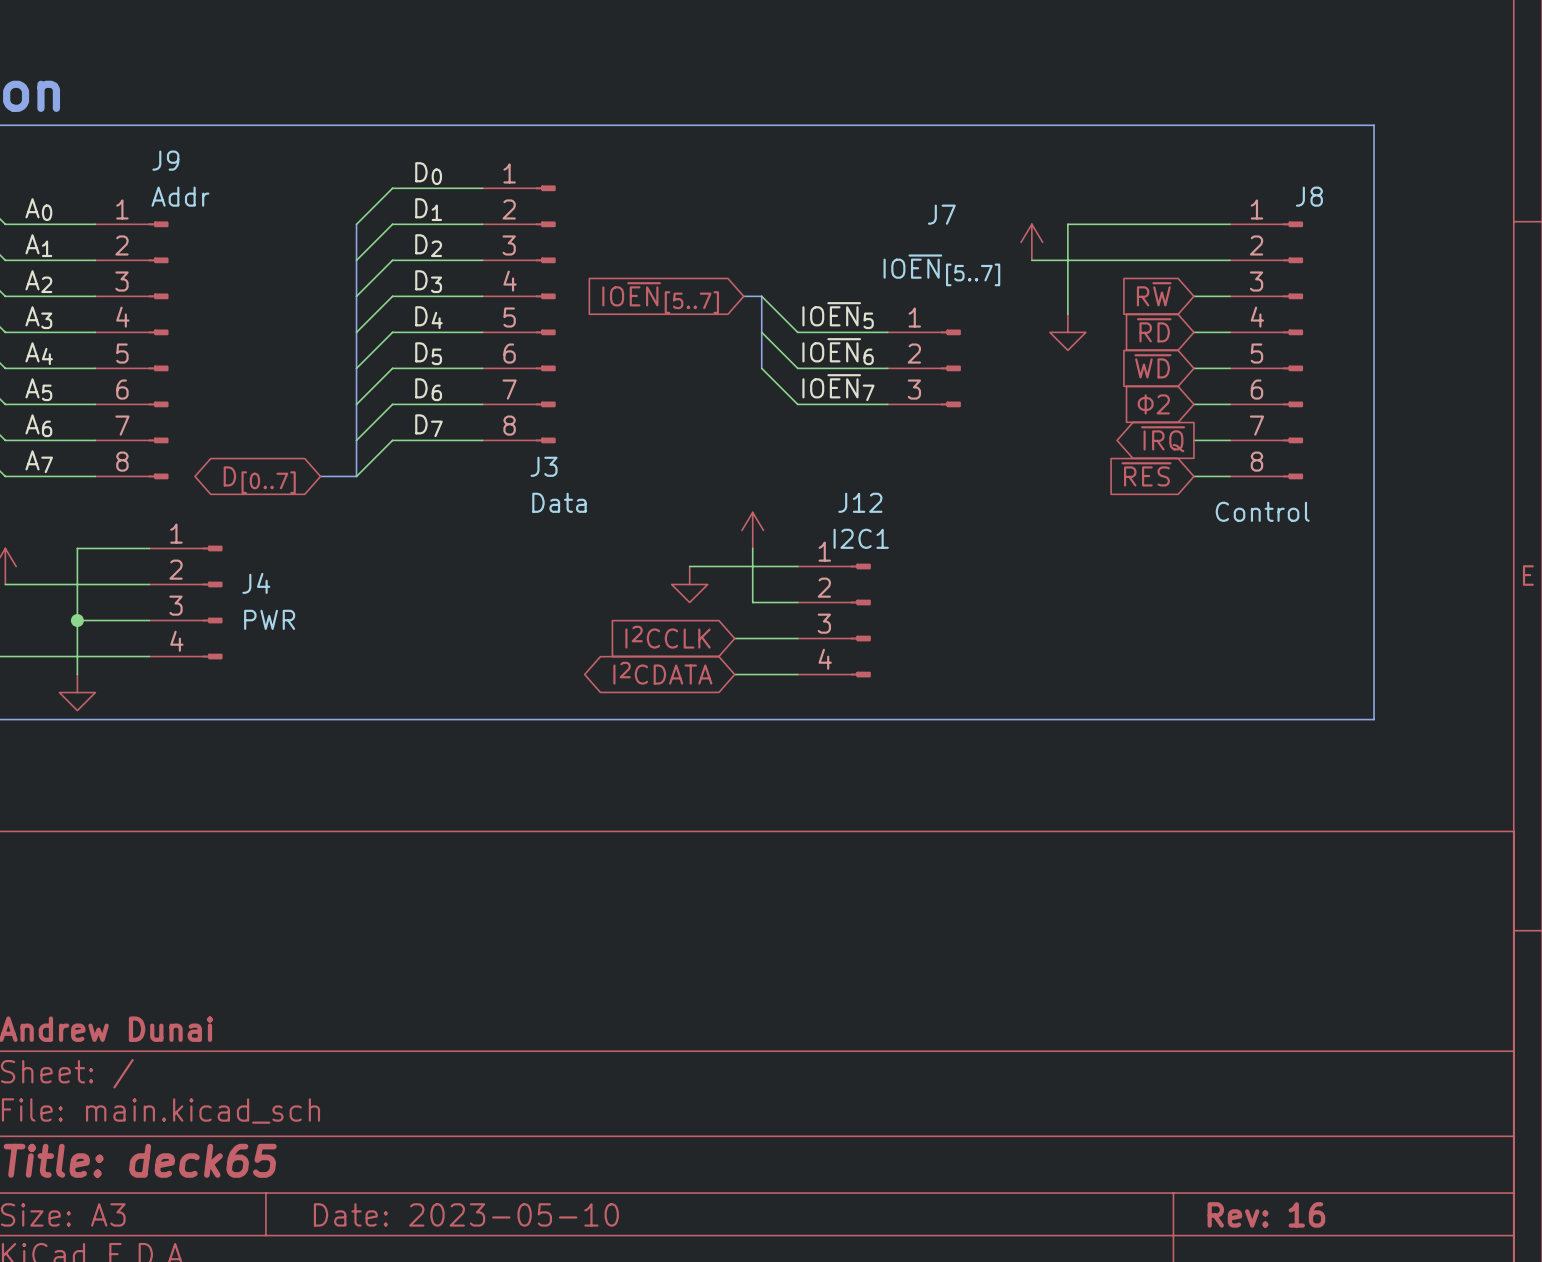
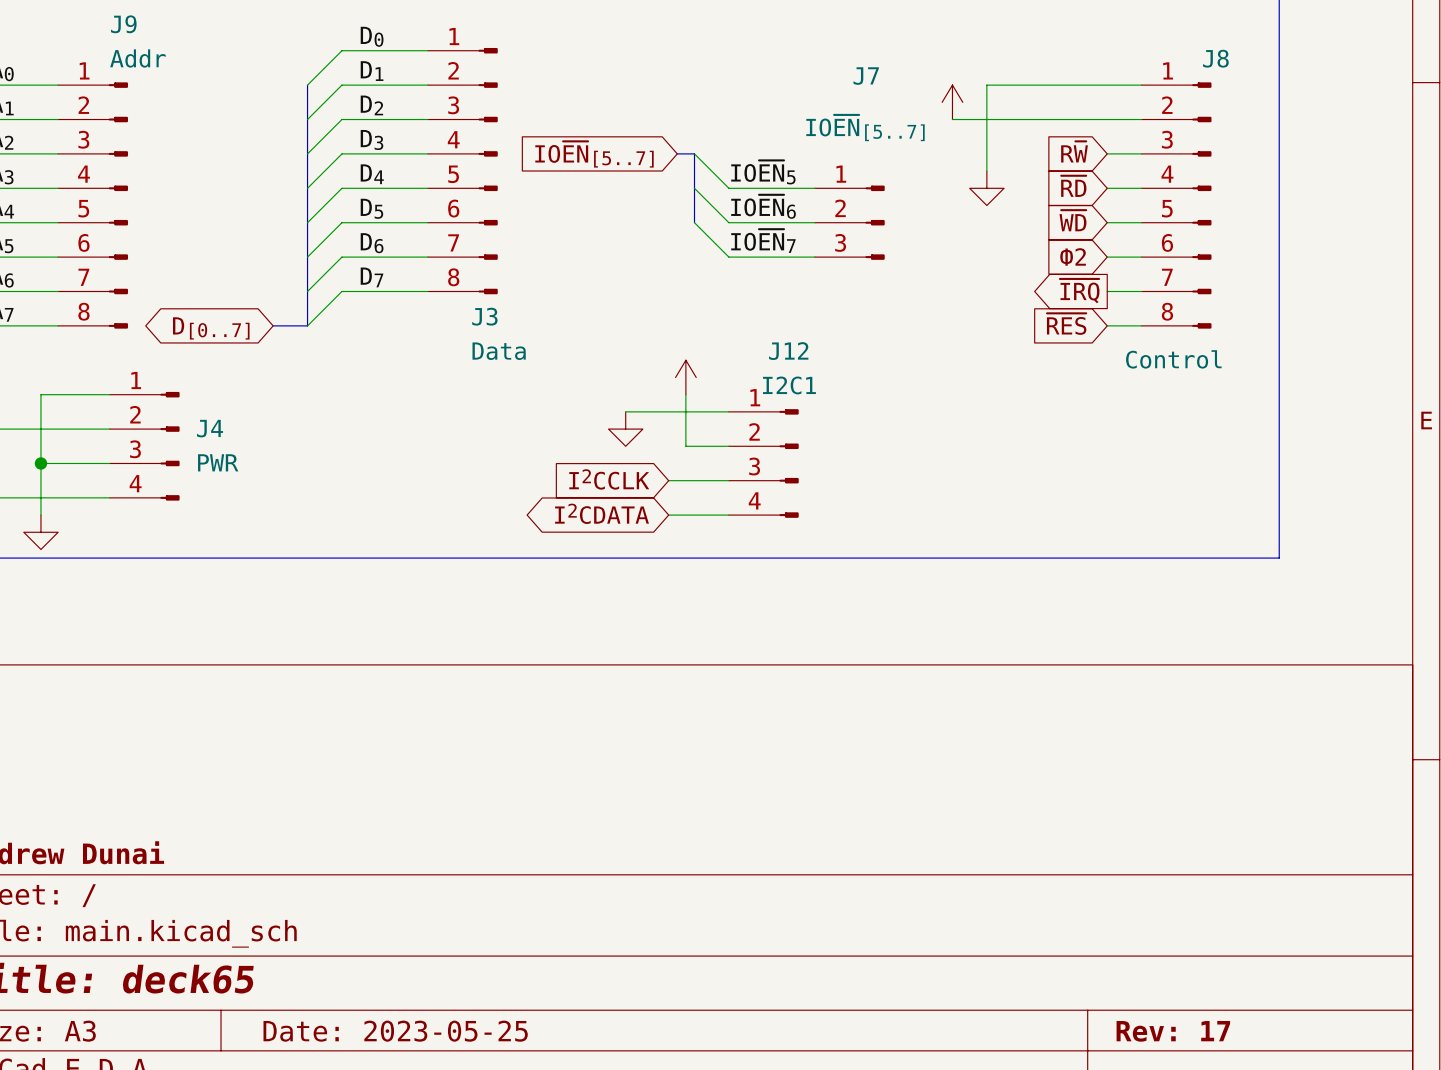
title block: Date: 2023-05-10 (466, 1214) -> Date: 2023-05-25 (395, 1031)
title block: Rev: 16 (1266, 1214) -> Rev: 17 (1173, 1031)

